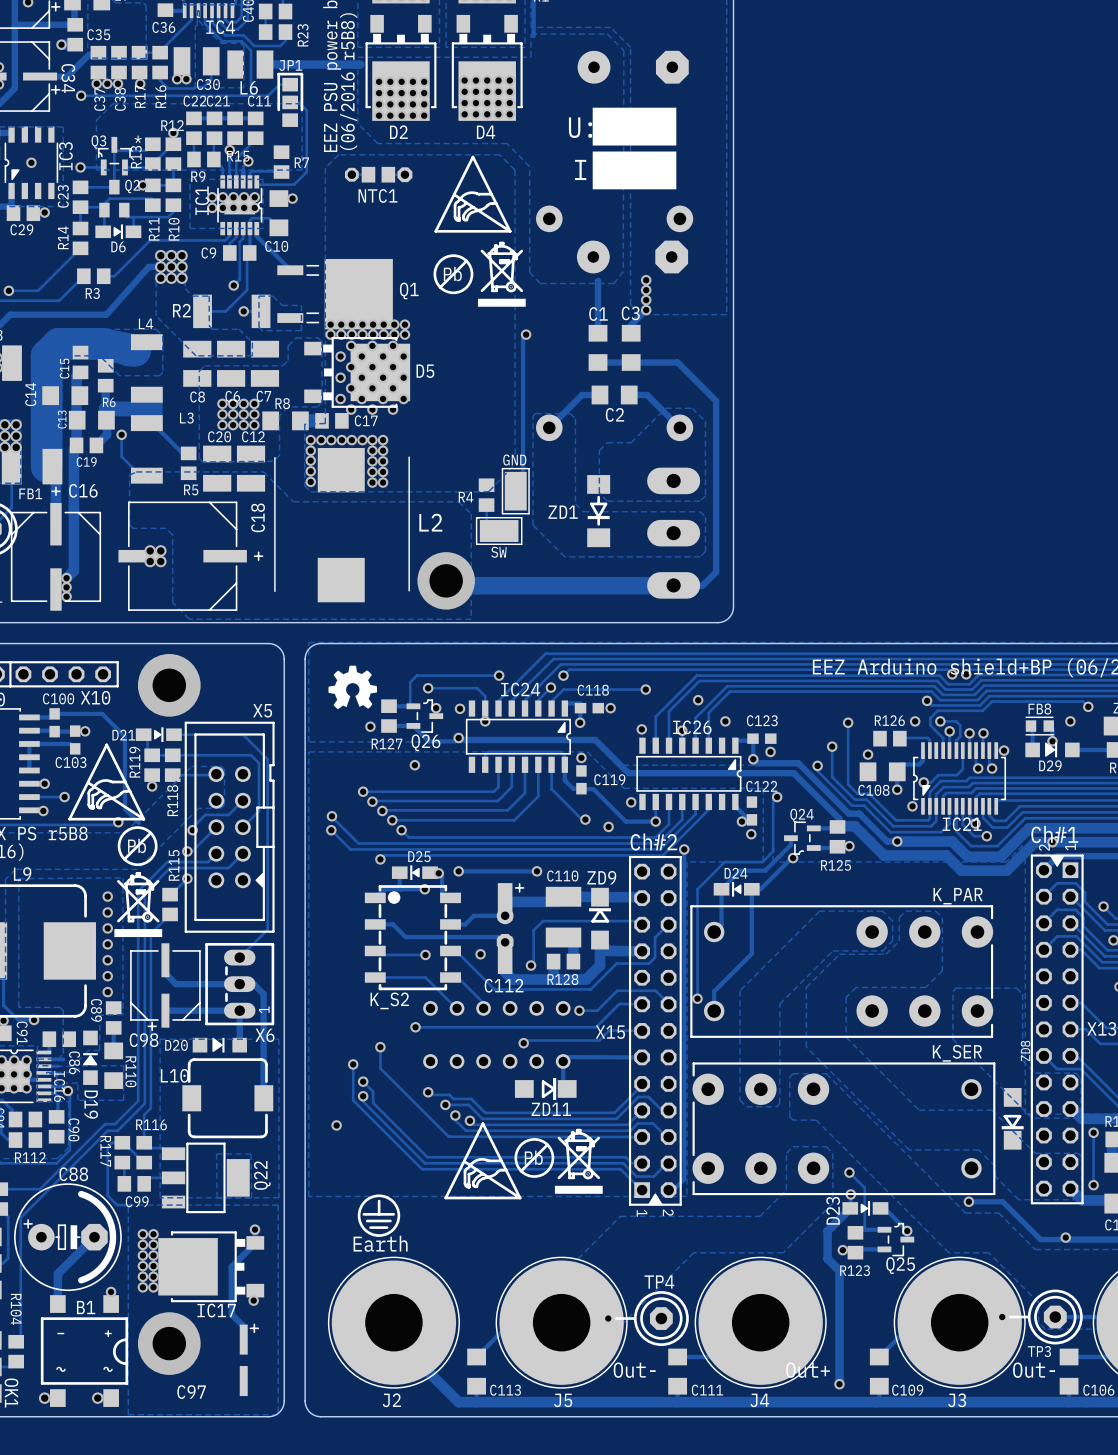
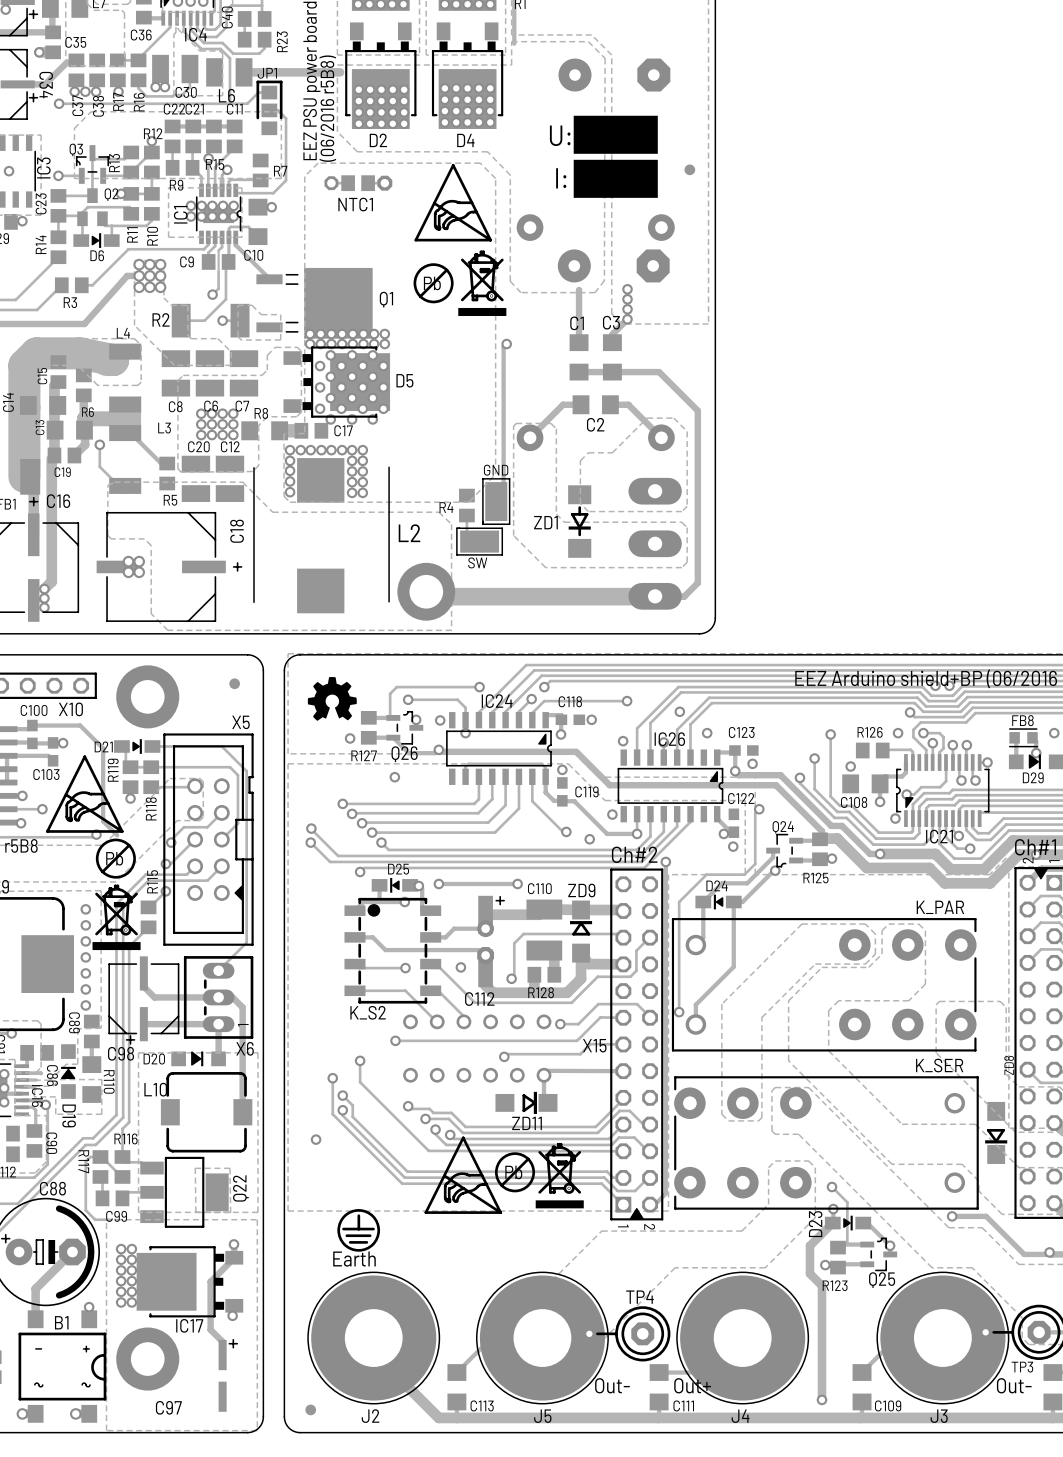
text: * (138, 139) -> none
part: none -> (689, 169)
part: none -> (234, 683)
part: none -> (310, 1409)

